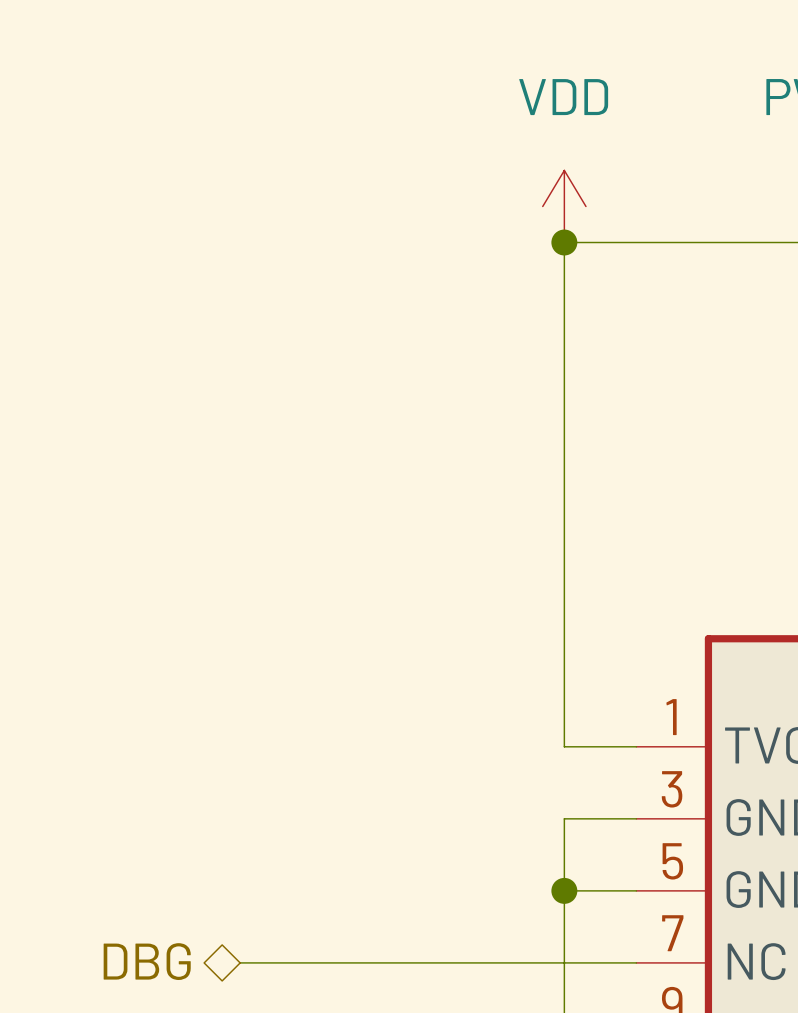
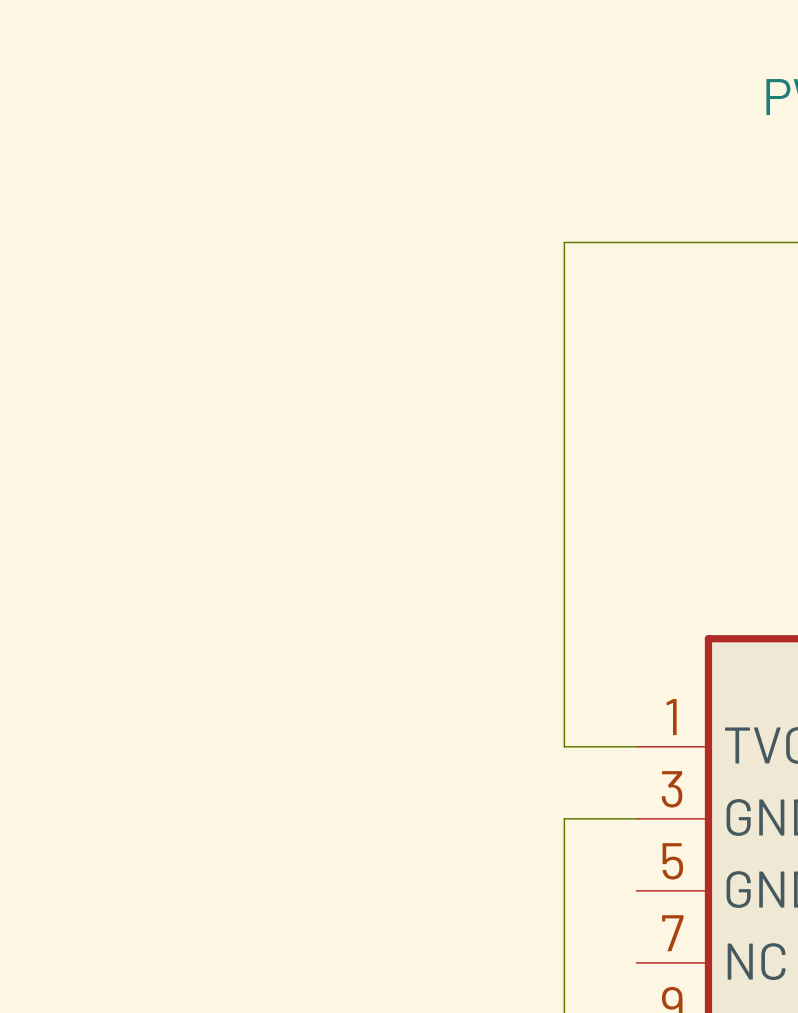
power symbol: VDD (564, 206) -> none
junction: (564, 242) -> none
wire: (564, 890) (636, 890) -> none
junction: (564, 890) -> none
hierarchical label: DBG (147, 961) -> none
wire: (240, 962) (636, 962) -> none

